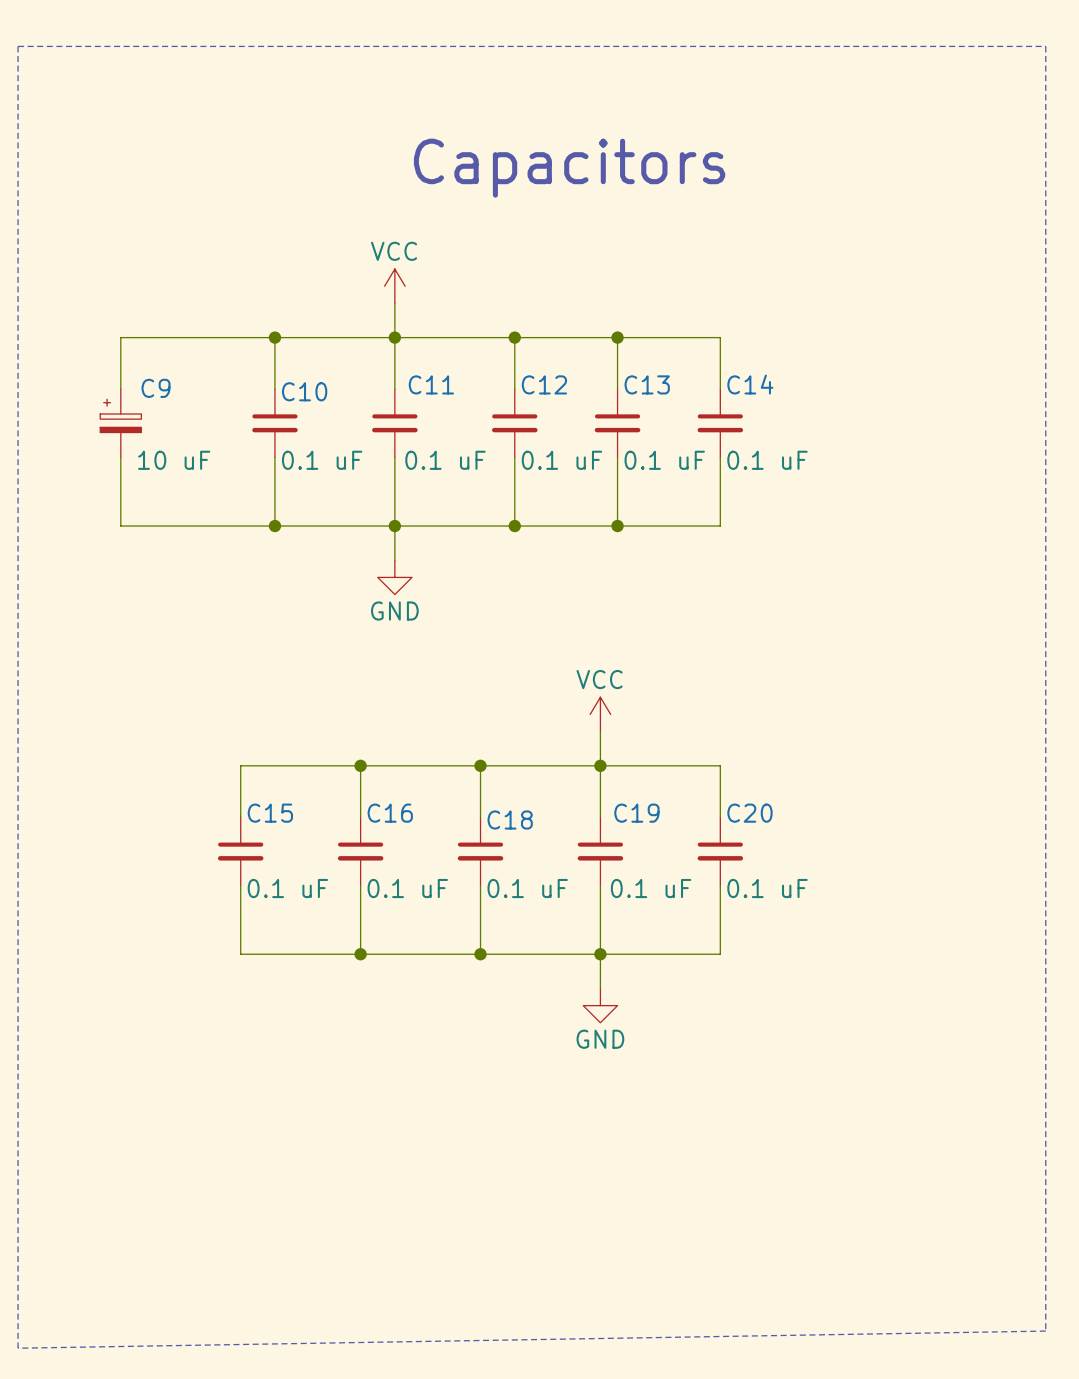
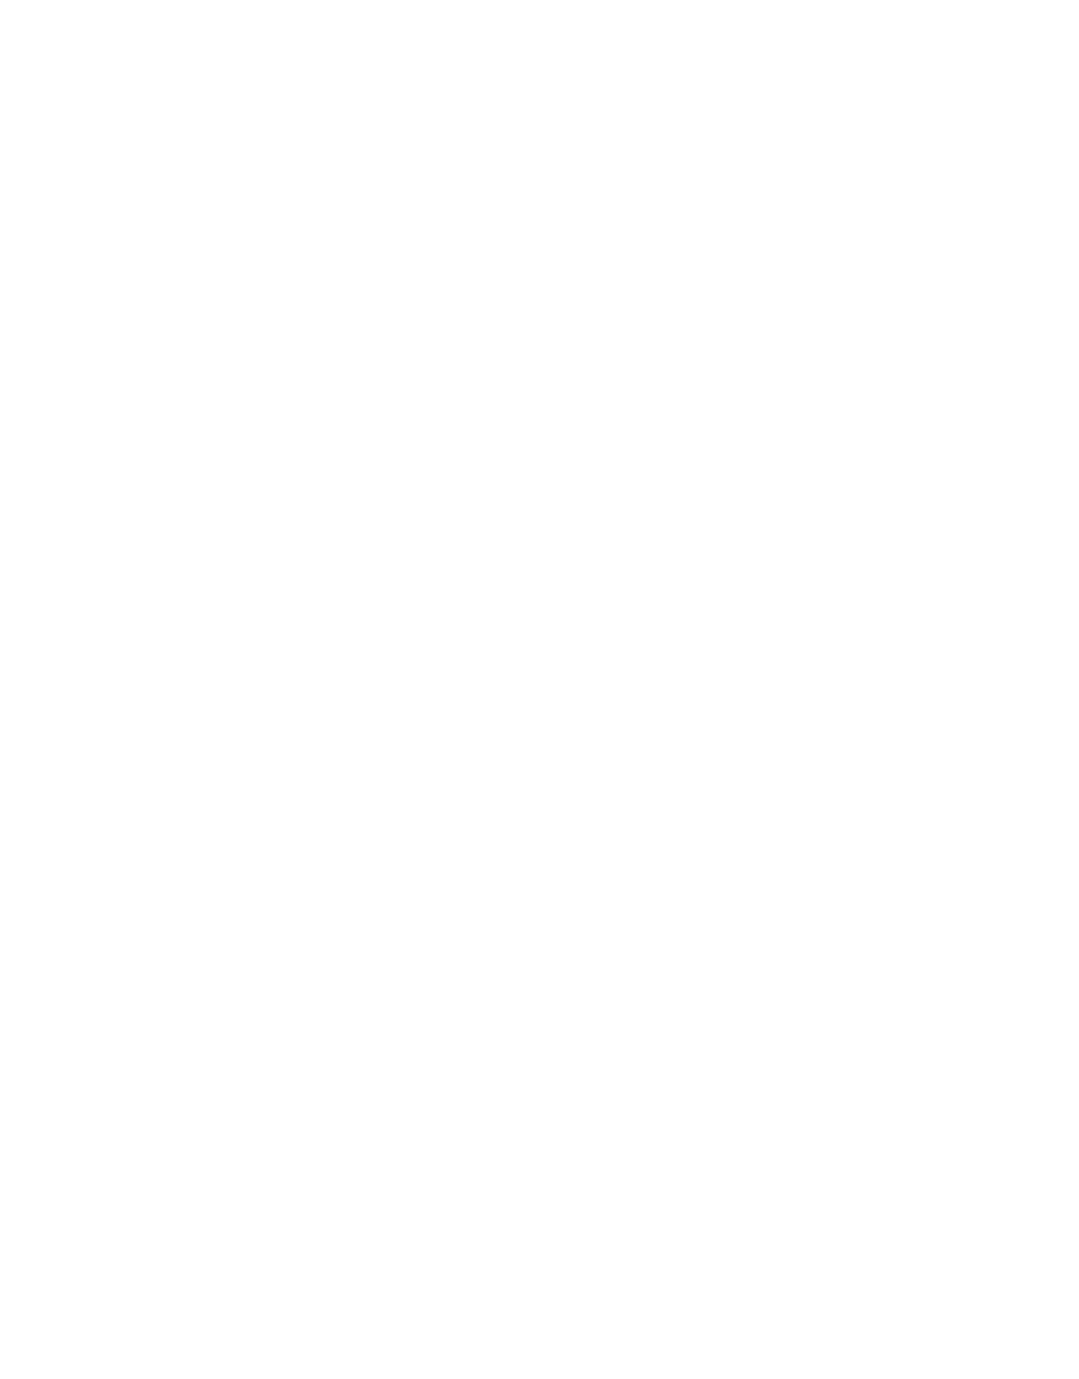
line: (18, 46) (1045, 46) (1045, 1331) (18, 1348) (18, 46) -> none
text: Capacitors (569, 168) -> none
power symbol: VCC (394, 286) -> none
wire: (394, 303) (394, 388) -> none
wire: (274, 337) (274, 388) -> none
junction: (274, 337) -> none
junction: (394, 337) -> none
wire: (514, 337) (514, 388) -> none
junction: (514, 337) -> none
wire: (617, 337) (617, 388) -> none
junction: (617, 337) -> none
wire: (120, 388) (120, 337) (720, 337) (720, 388) -> none
C9: 10 uF (120, 423) -> none
C10: 0.1 uF (274, 423) -> none
C11: 0.1 uF (394, 423) -> none
C12: 0.1 uF (514, 423) -> none
C13: 0.1 uF (617, 423) -> none
C14: 0.1 uF (720, 423) -> none
wire: (120, 457) (120, 526) (720, 526) (720, 457) -> none
wire: (274, 457) (274, 526) -> none
wire: (394, 457) (394, 560) -> none
wire: (514, 457) (514, 526) -> none
wire: (617, 457) (617, 526) -> none
junction: (274, 526) -> none
junction: (394, 526) -> none
junction: (514, 526) -> none
junction: (617, 526) -> none
power symbol: GND (394, 577) -> none
power symbol: VCC (600, 714) -> none
wire: (600, 731) (600, 817) -> none
wire: (360, 765) (360, 817) -> none
junction: (360, 765) -> none
wire: (480, 765) (480, 817) -> none
junction: (480, 765) -> none
junction: (600, 765) -> none
wire: (240, 817) (240, 765) (720, 765) (720, 817) -> none
C15: 0.1 uF (240, 851) -> none
C16: 0.1 uF (360, 851) -> none
C18: 0.1 uF (480, 851) -> none
C19: 0.1 uF (600, 851) -> none
C20: 0.1 uF (720, 851) -> none
wire: (240, 885) (240, 954) (720, 954) (720, 885) -> none
wire: (360, 885) (360, 954) -> none
wire: (480, 885) (480, 954) -> none
wire: (600, 885) (600, 988) -> none
junction: (360, 954) -> none
junction: (480, 954) -> none
junction: (600, 954) -> none
power symbol: GND (600, 1005) -> none

